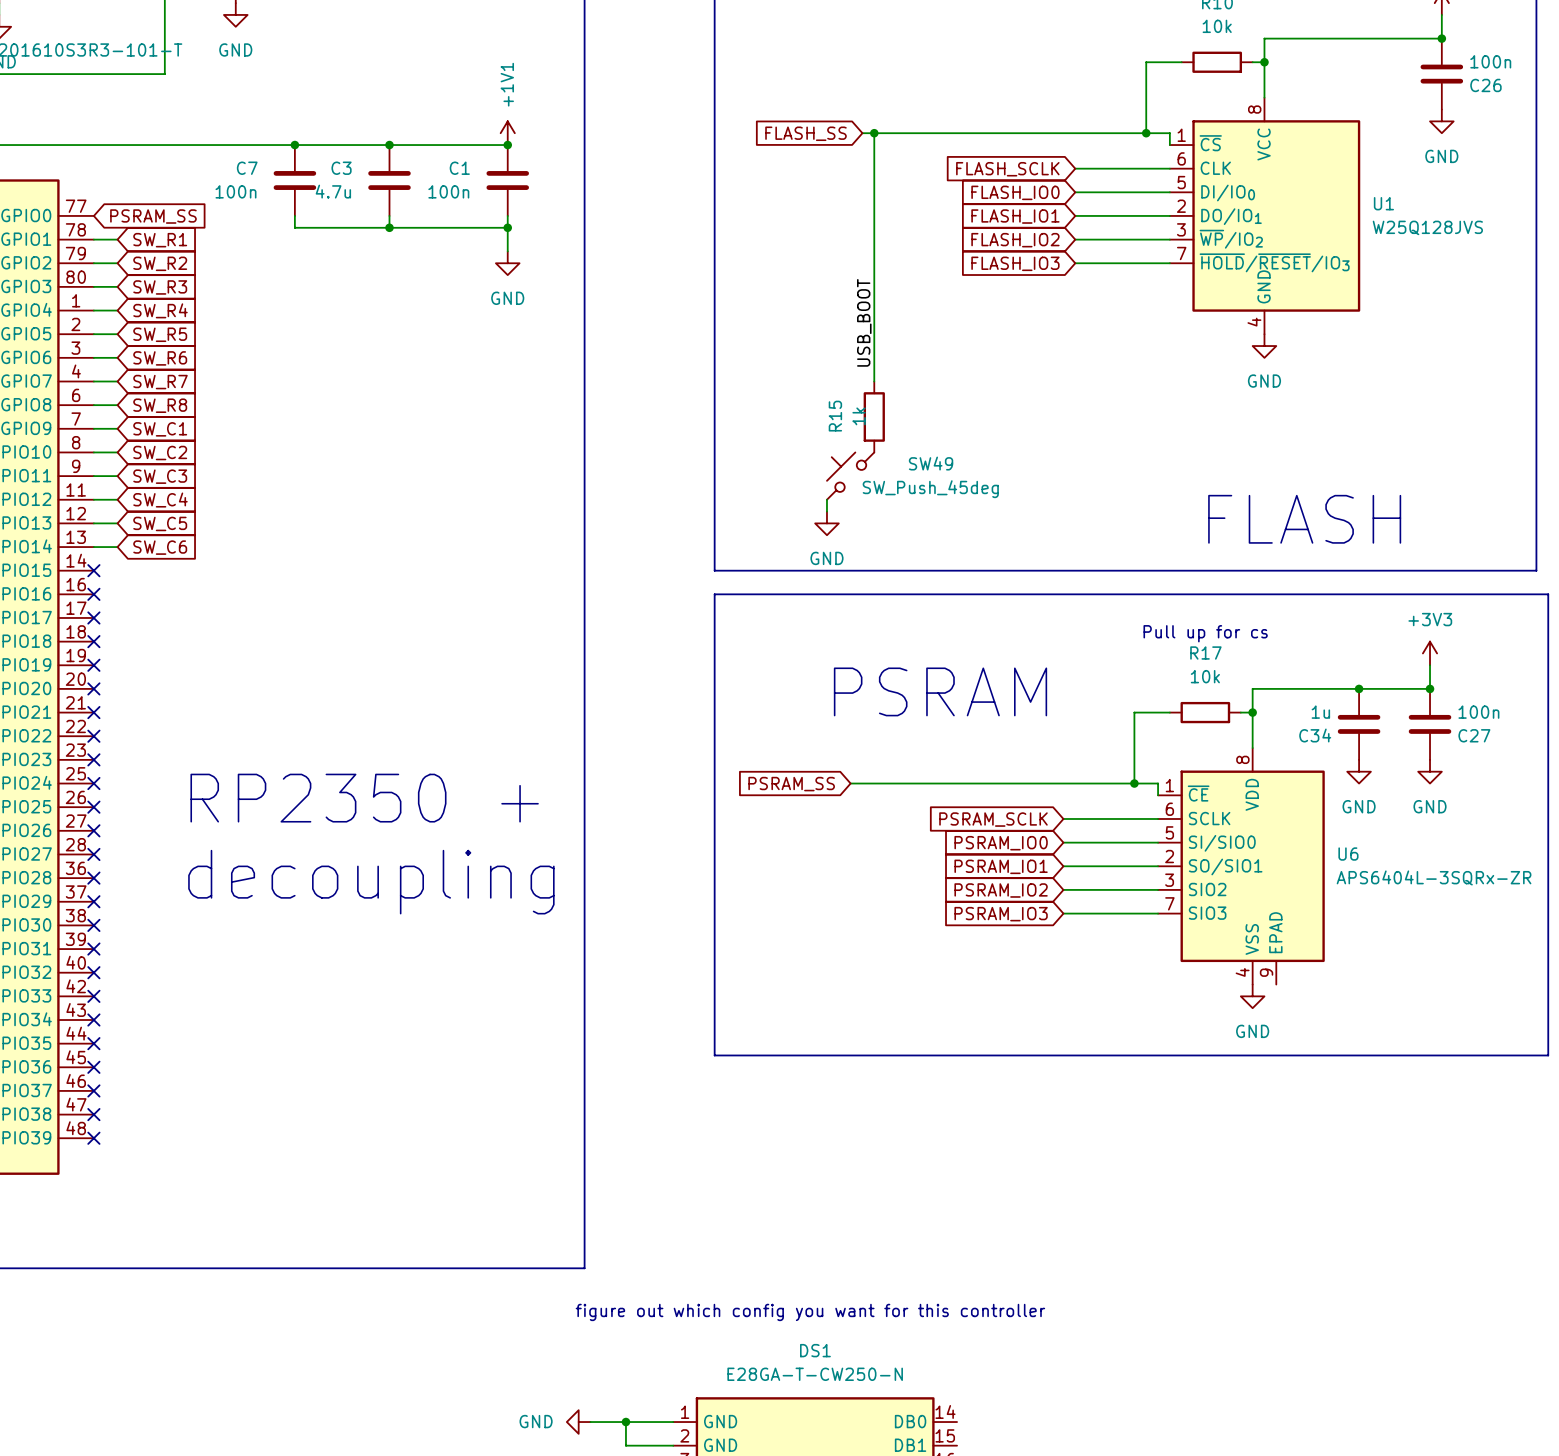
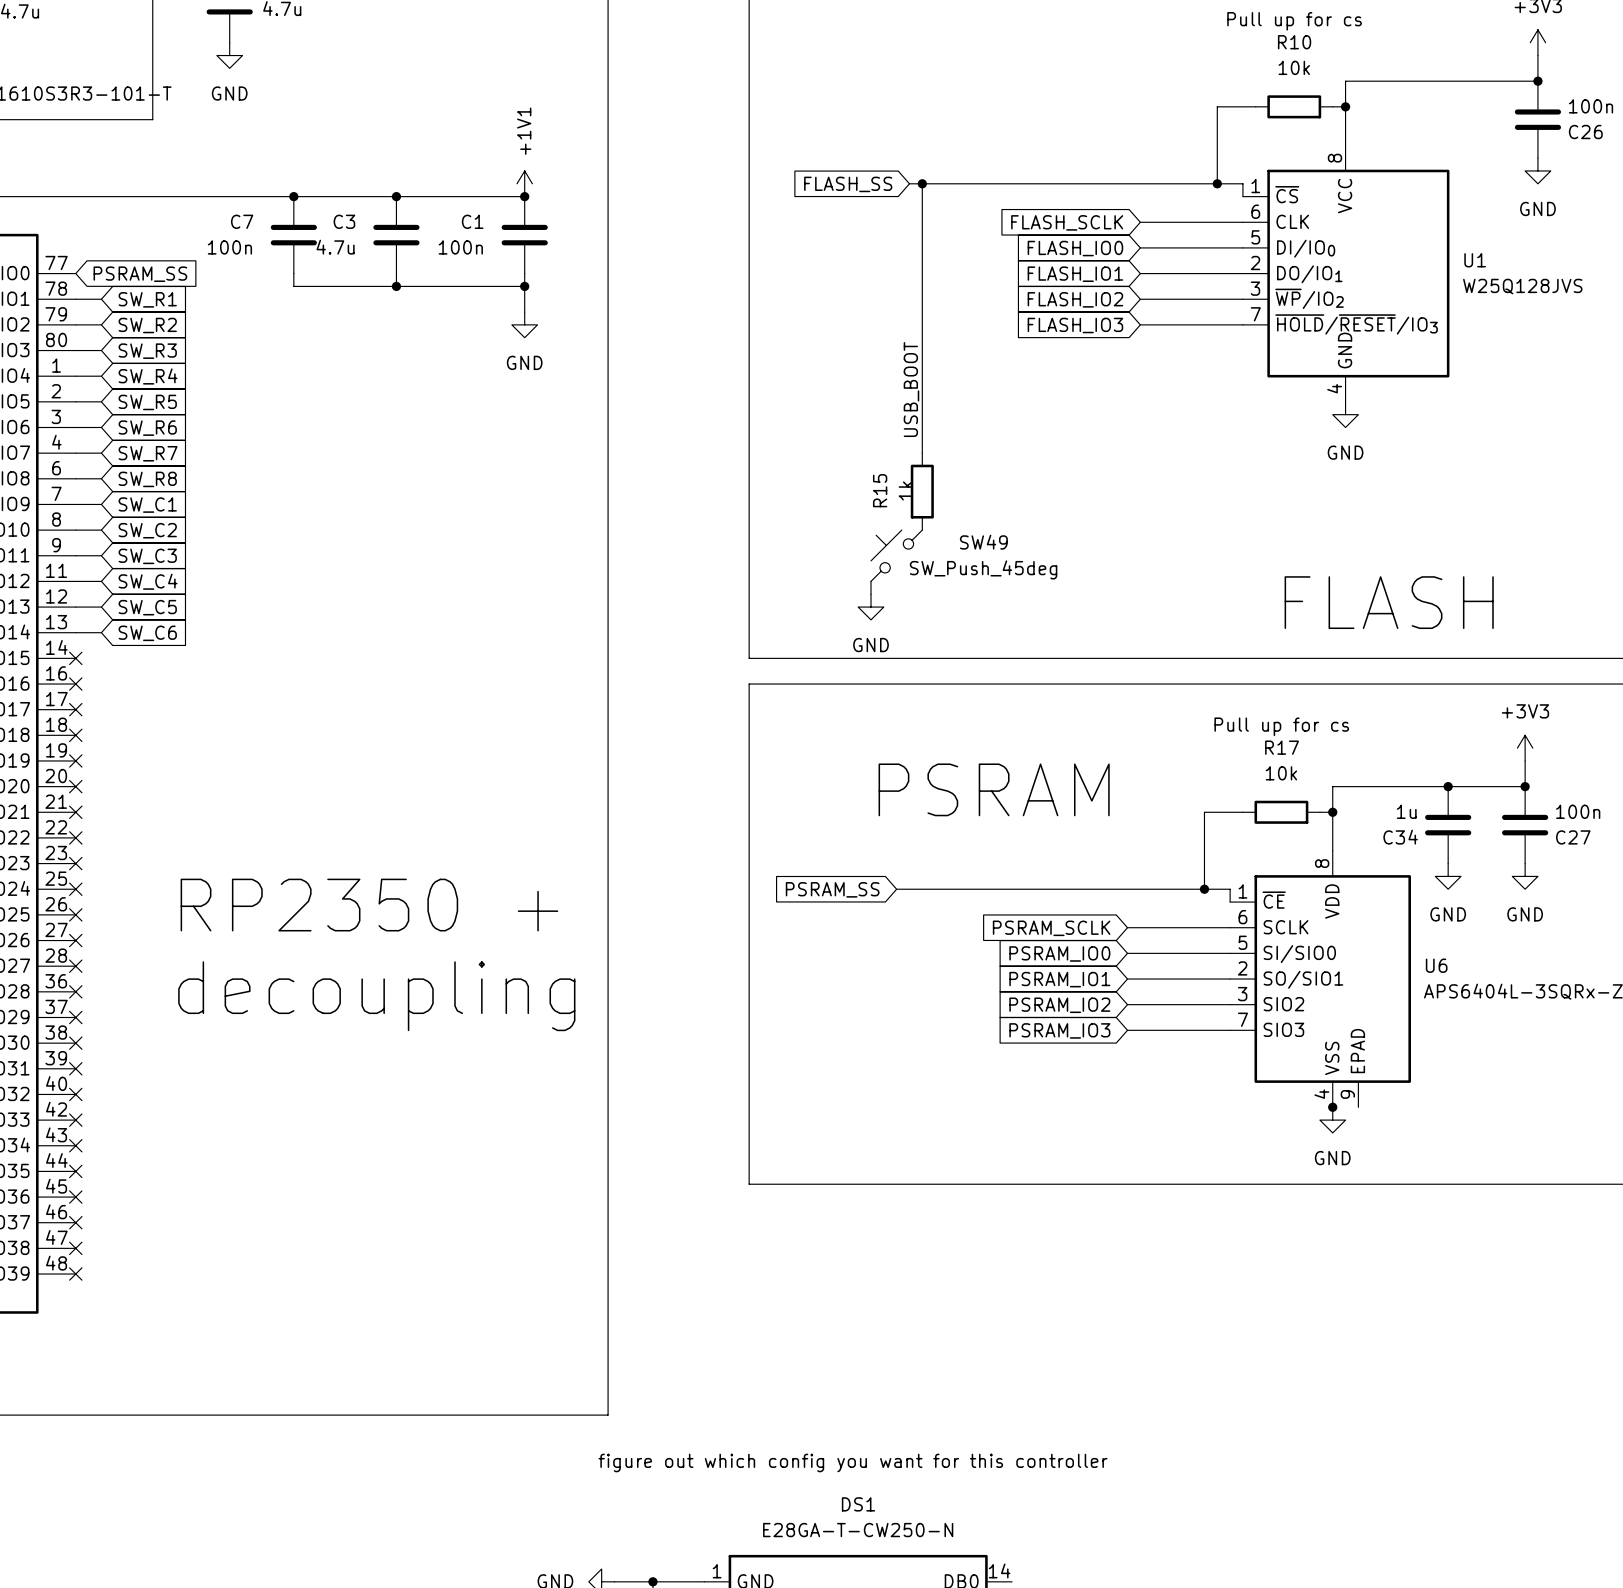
junction: none -> (1332, 1107)

